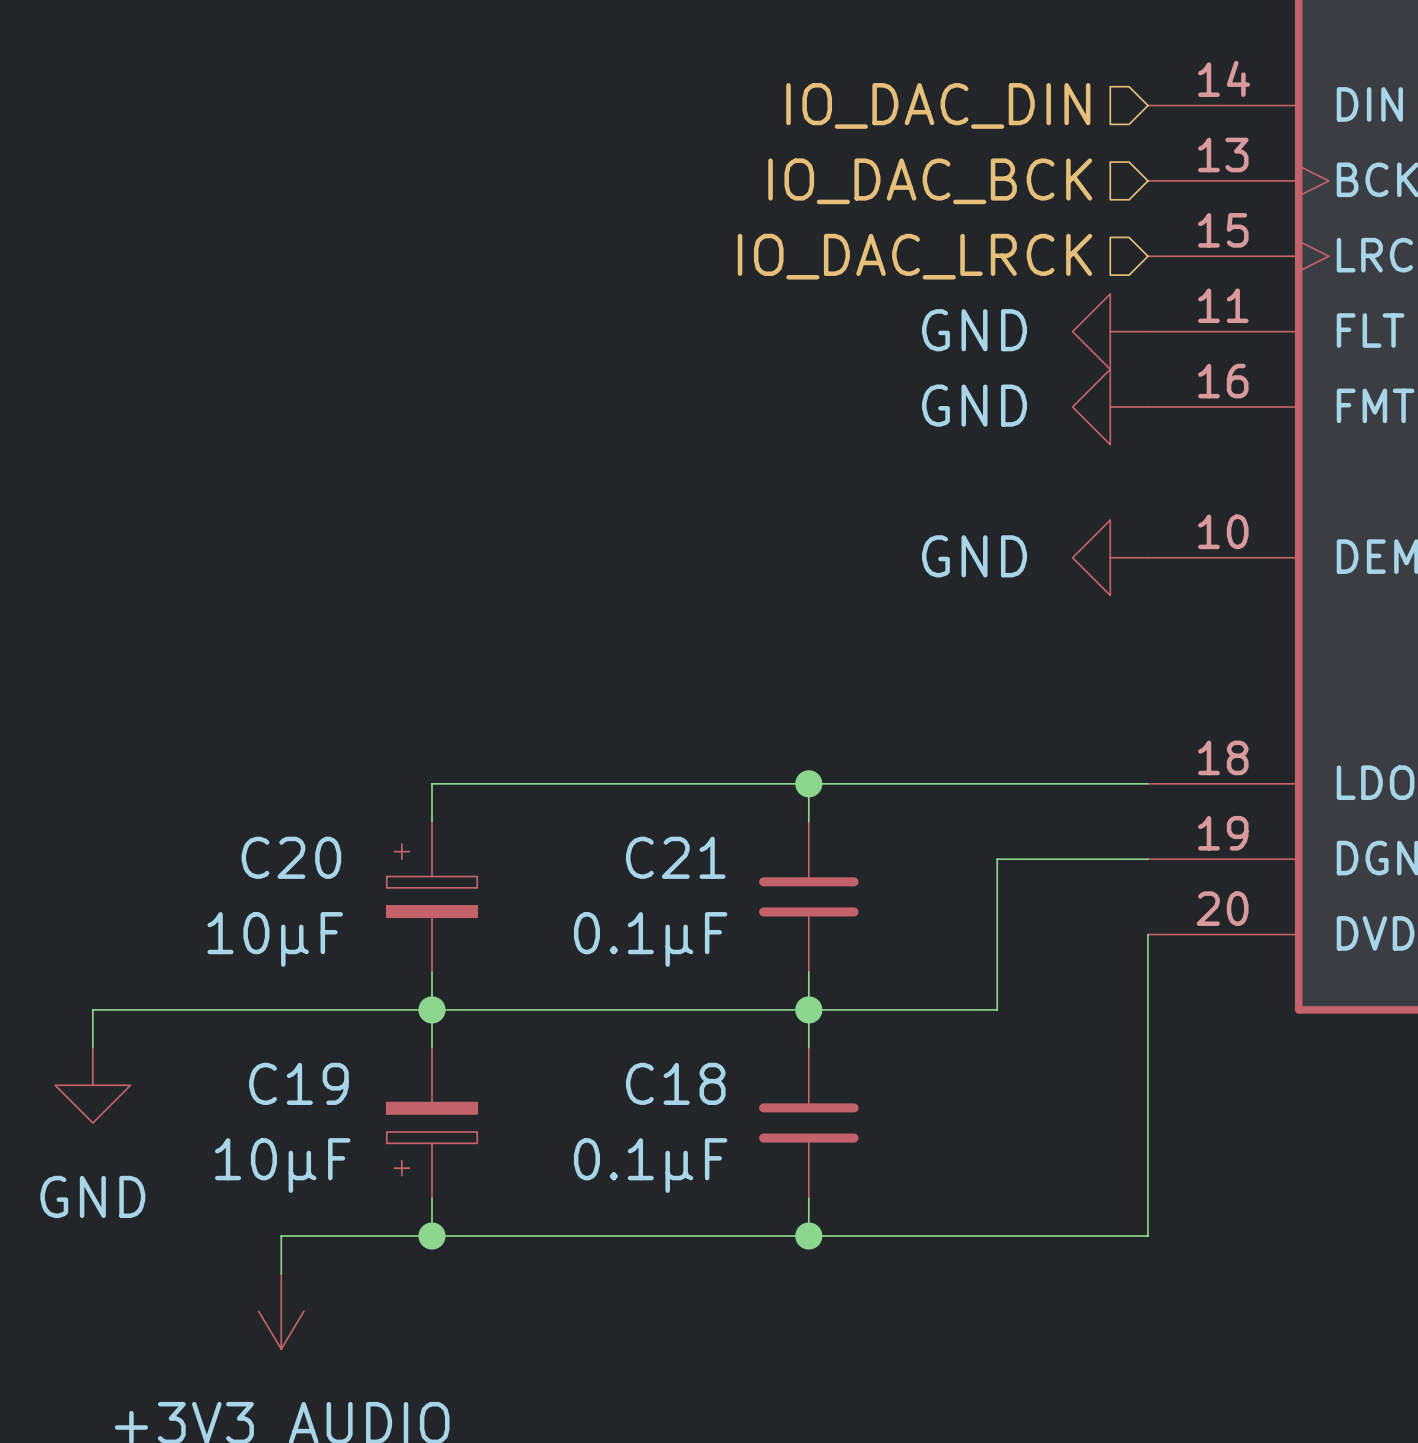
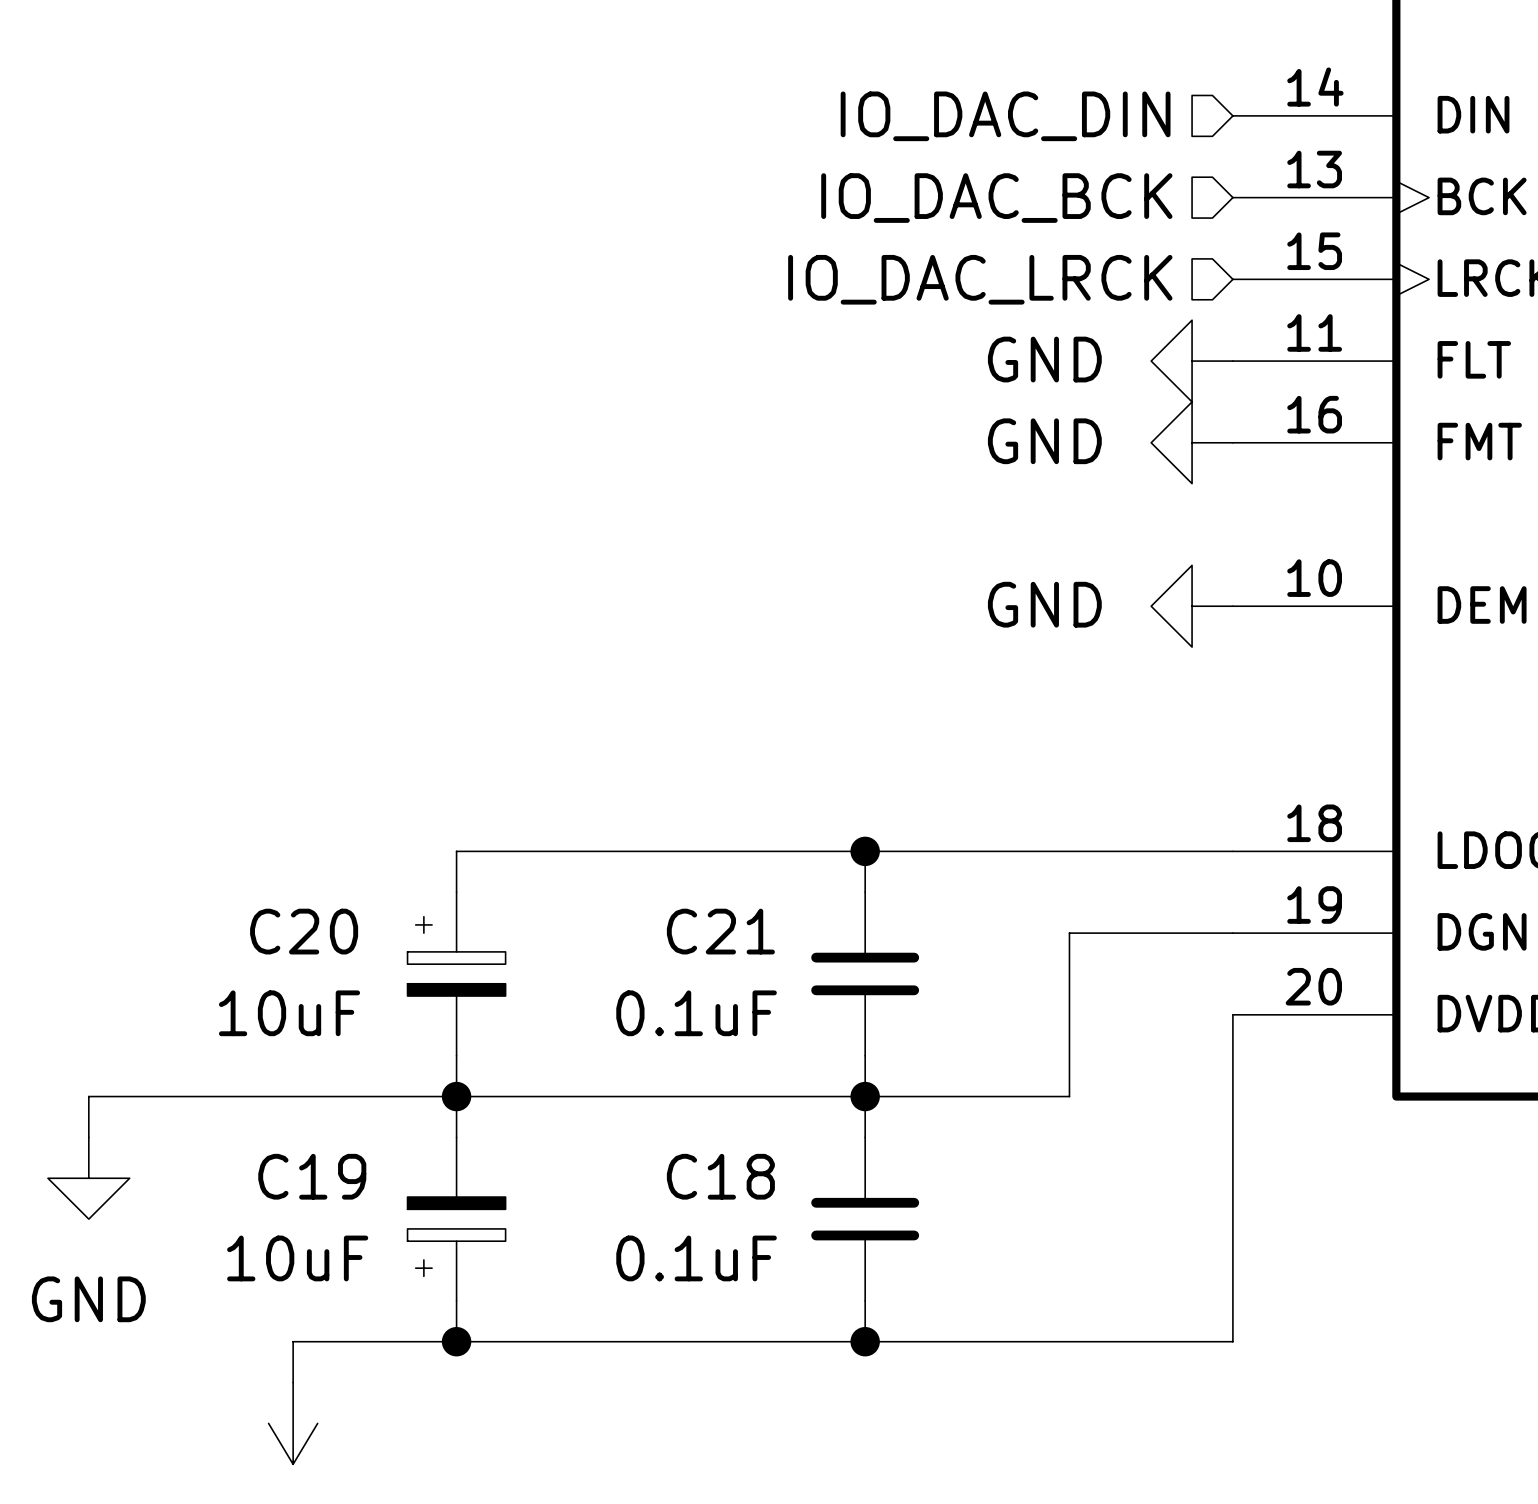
C20 value: 10μF (275, 939) -> 10uF (289, 1013)
C21 value: 0.1μF (650, 939) -> 0.1uF (696, 1013)
C19 value: 10μF (282, 1165) -> 10uF (297, 1258)
C18 value: 0.1μF (650, 1165) -> 0.1uF (696, 1258)

